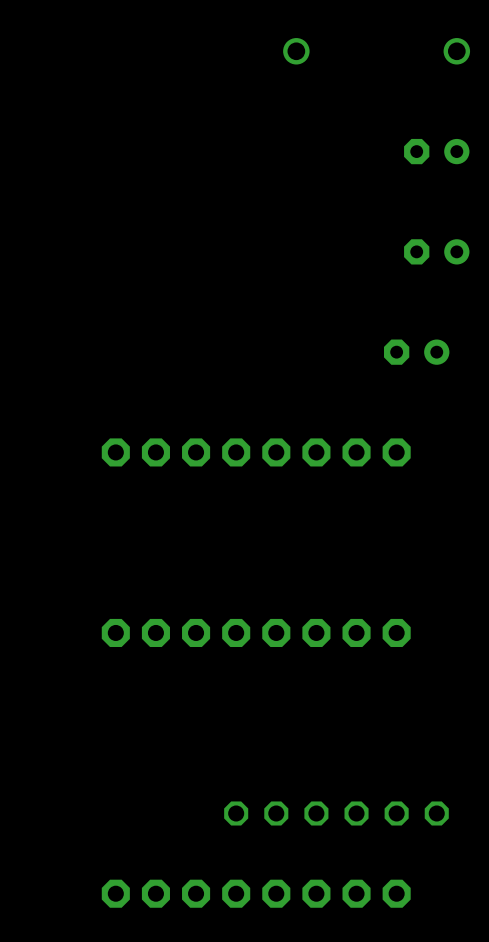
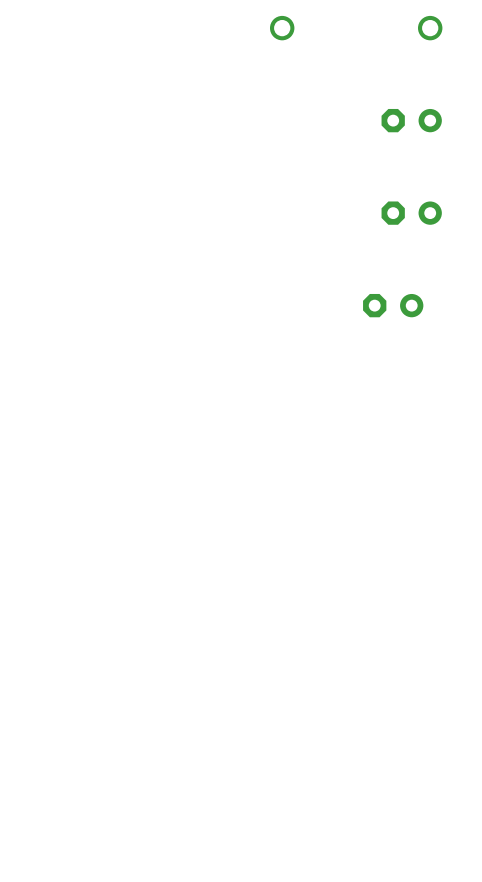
part: (256, 452) -> none
part: (256, 632) -> none
part: (336, 813) -> none
part: (256, 893) -> none

